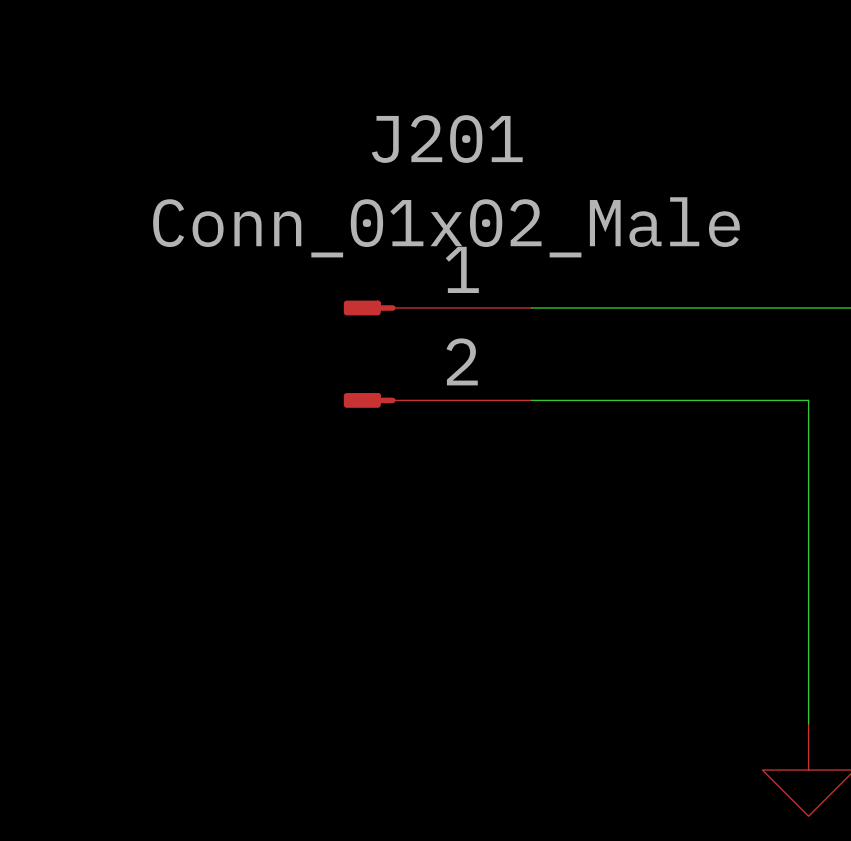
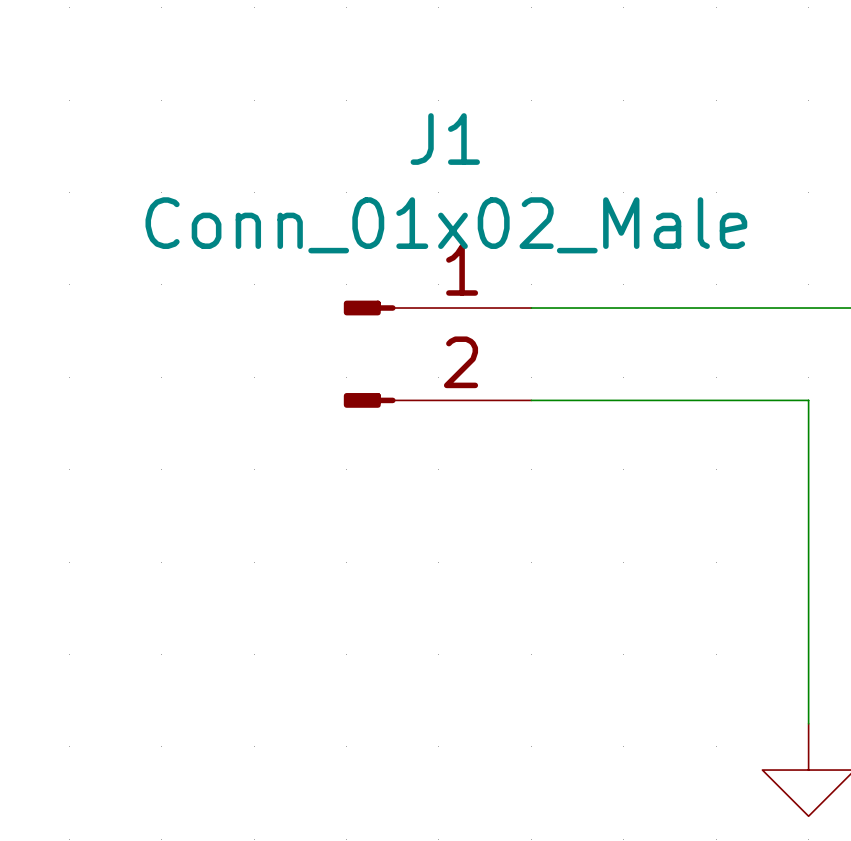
J201 name: J201 (447, 139) -> J1 (445, 139)

